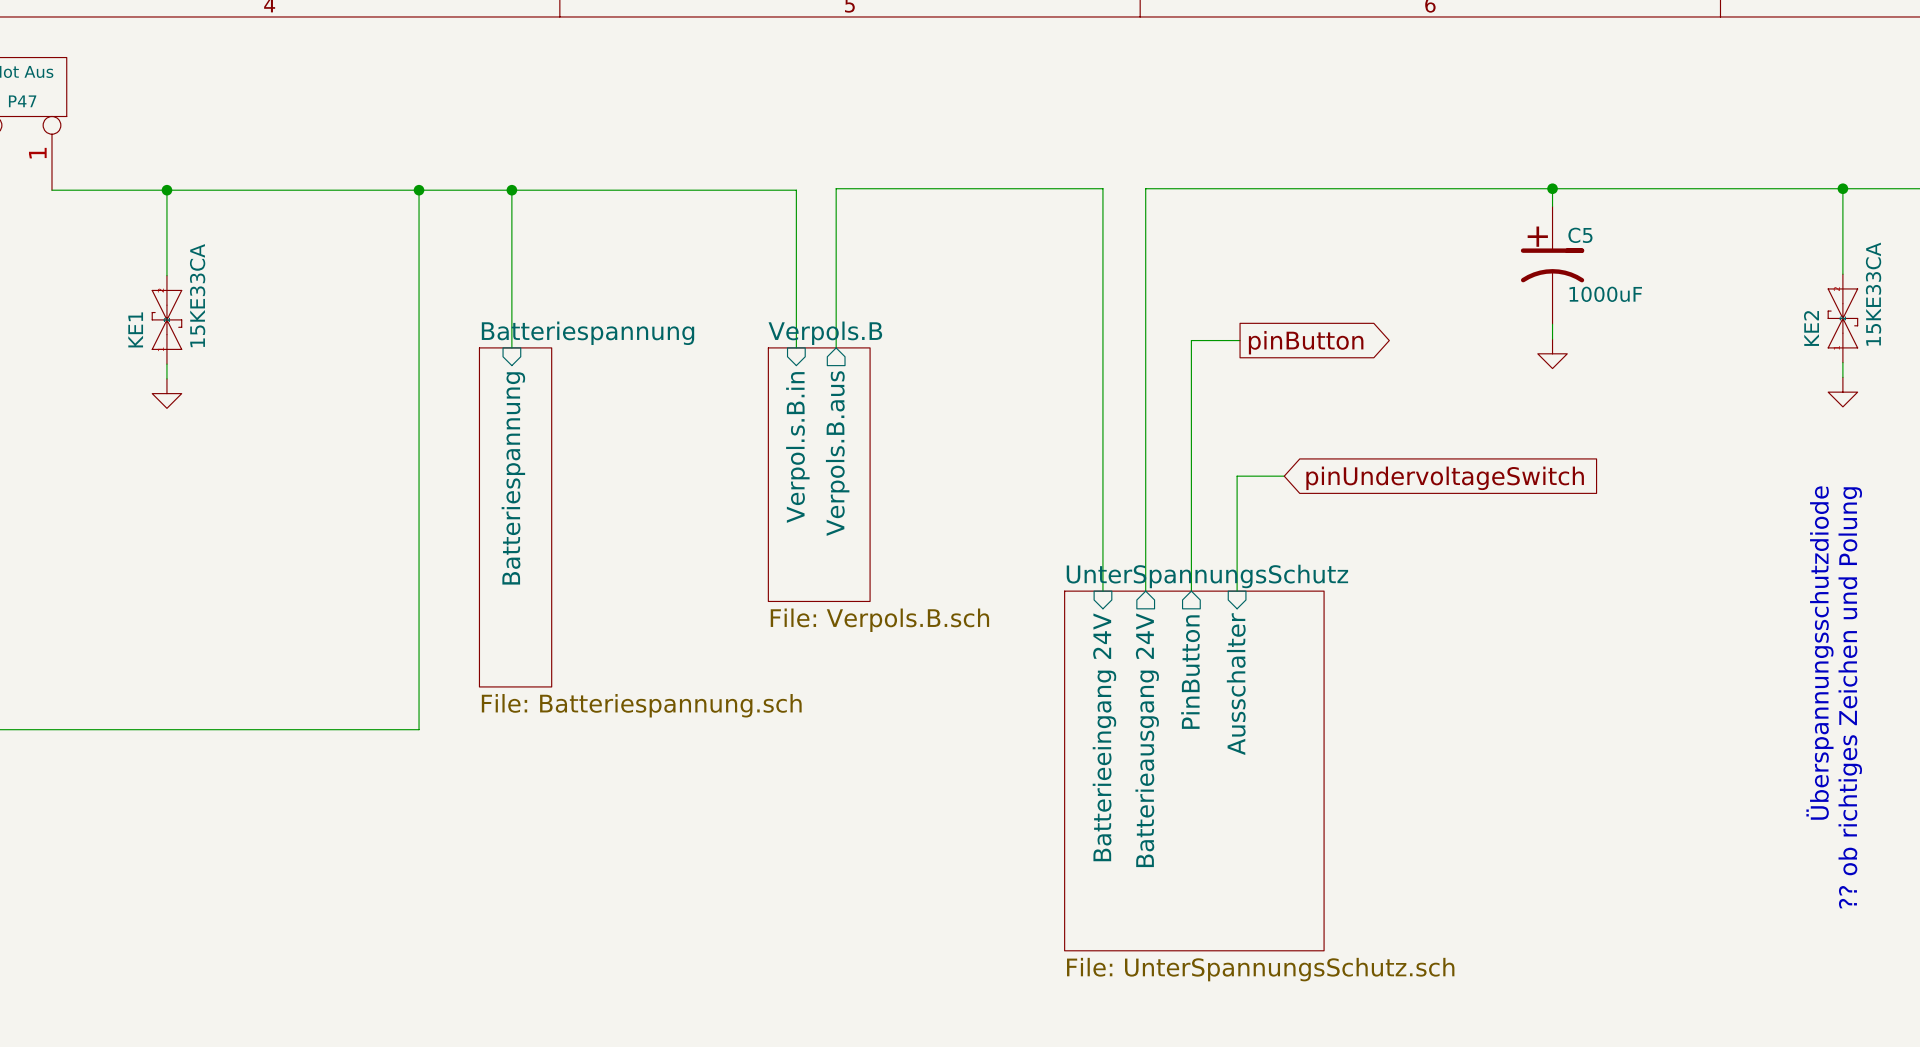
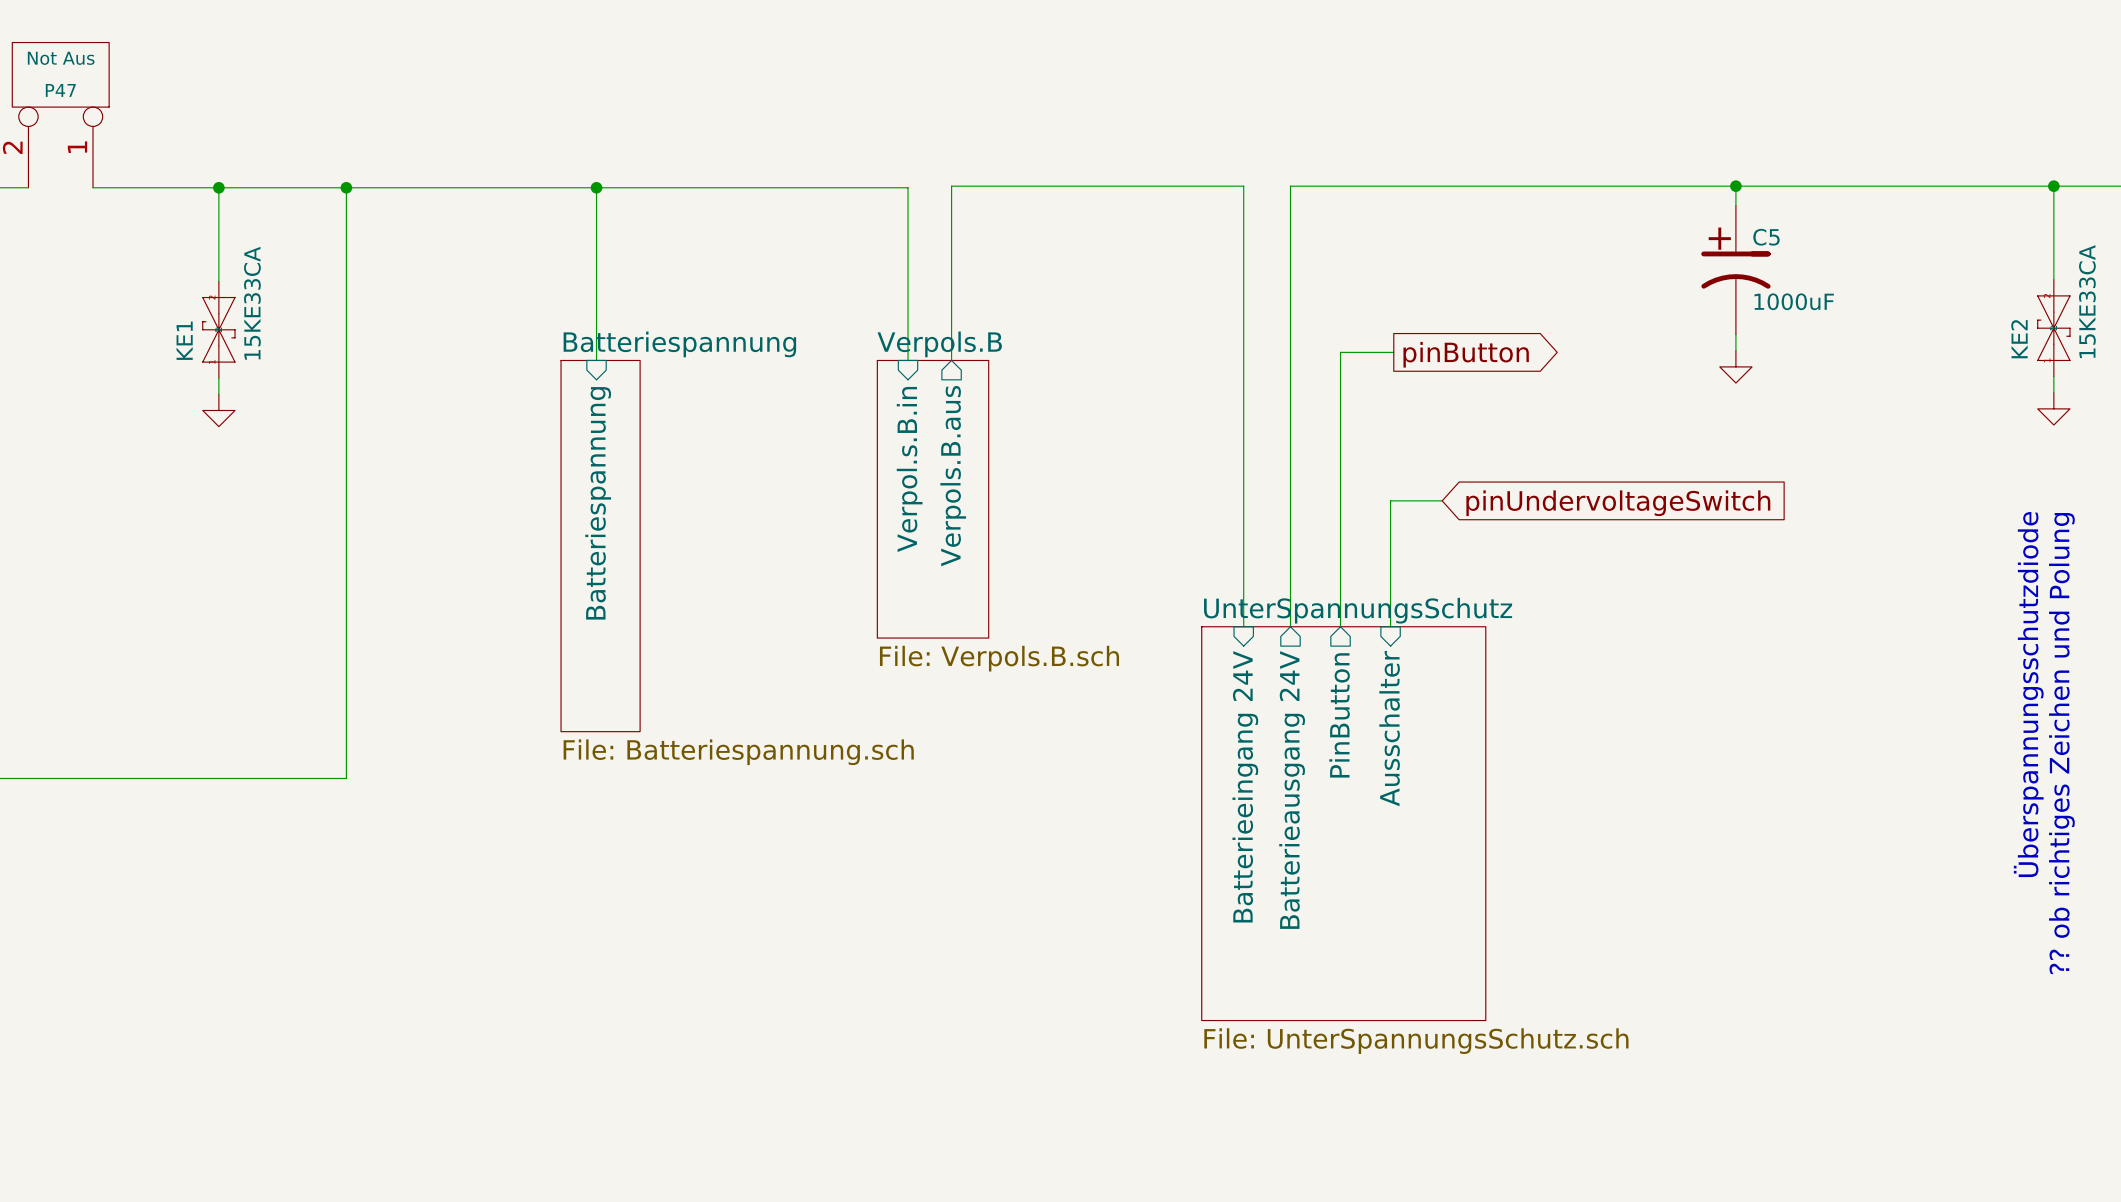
junction: none -> (346, 187)
wire: (419, 190) (419, 729) (283, 729) -> (346, 187) (346, 778)
junction: (419, 190) -> none

